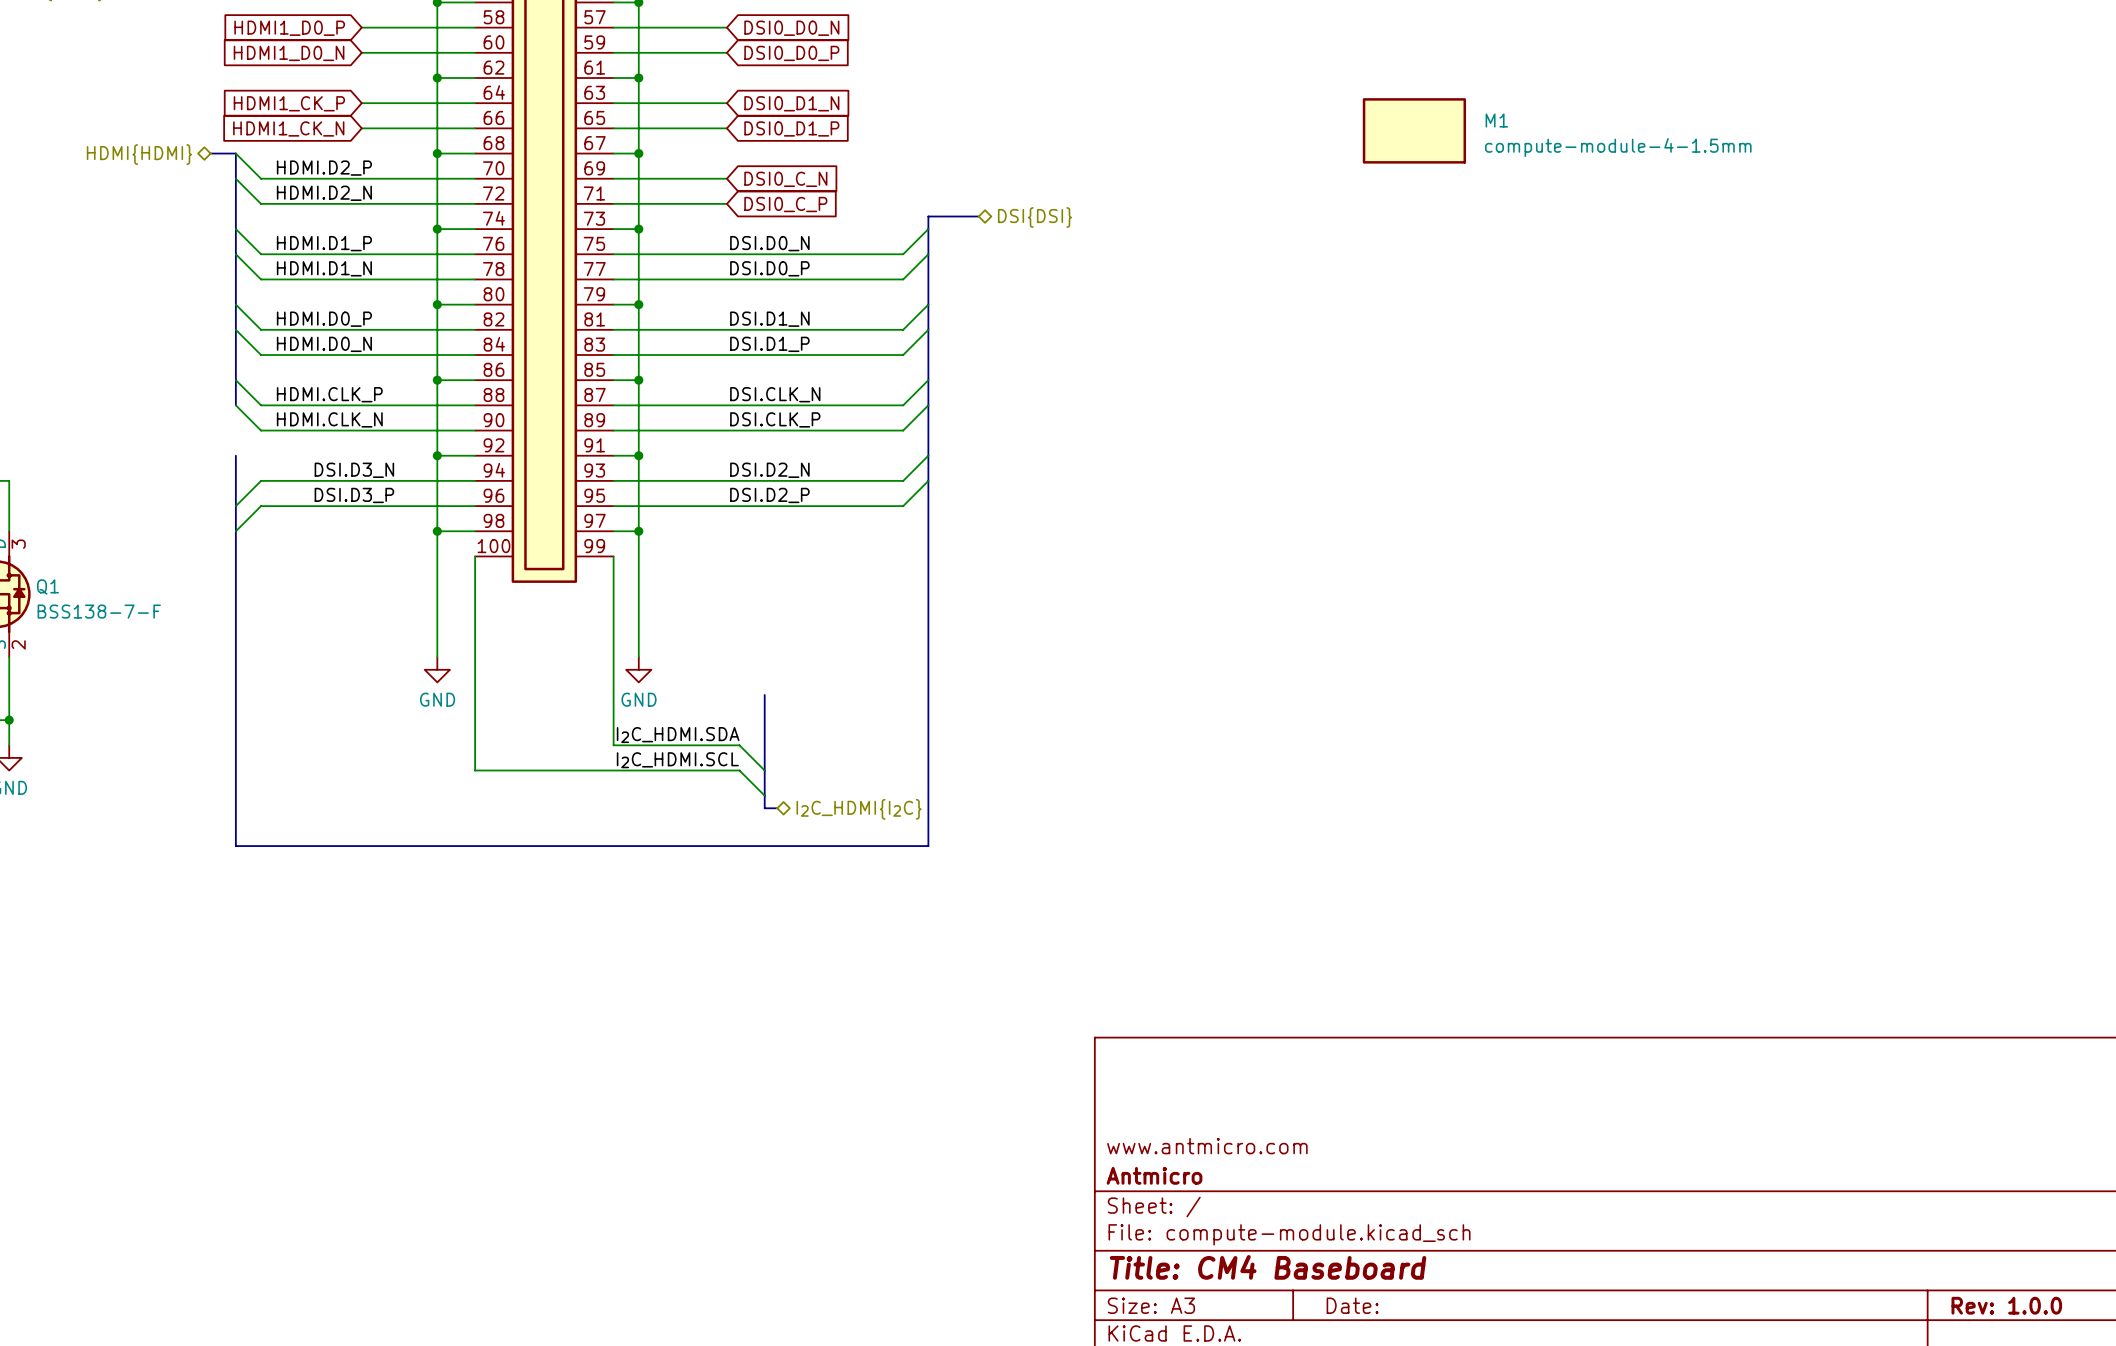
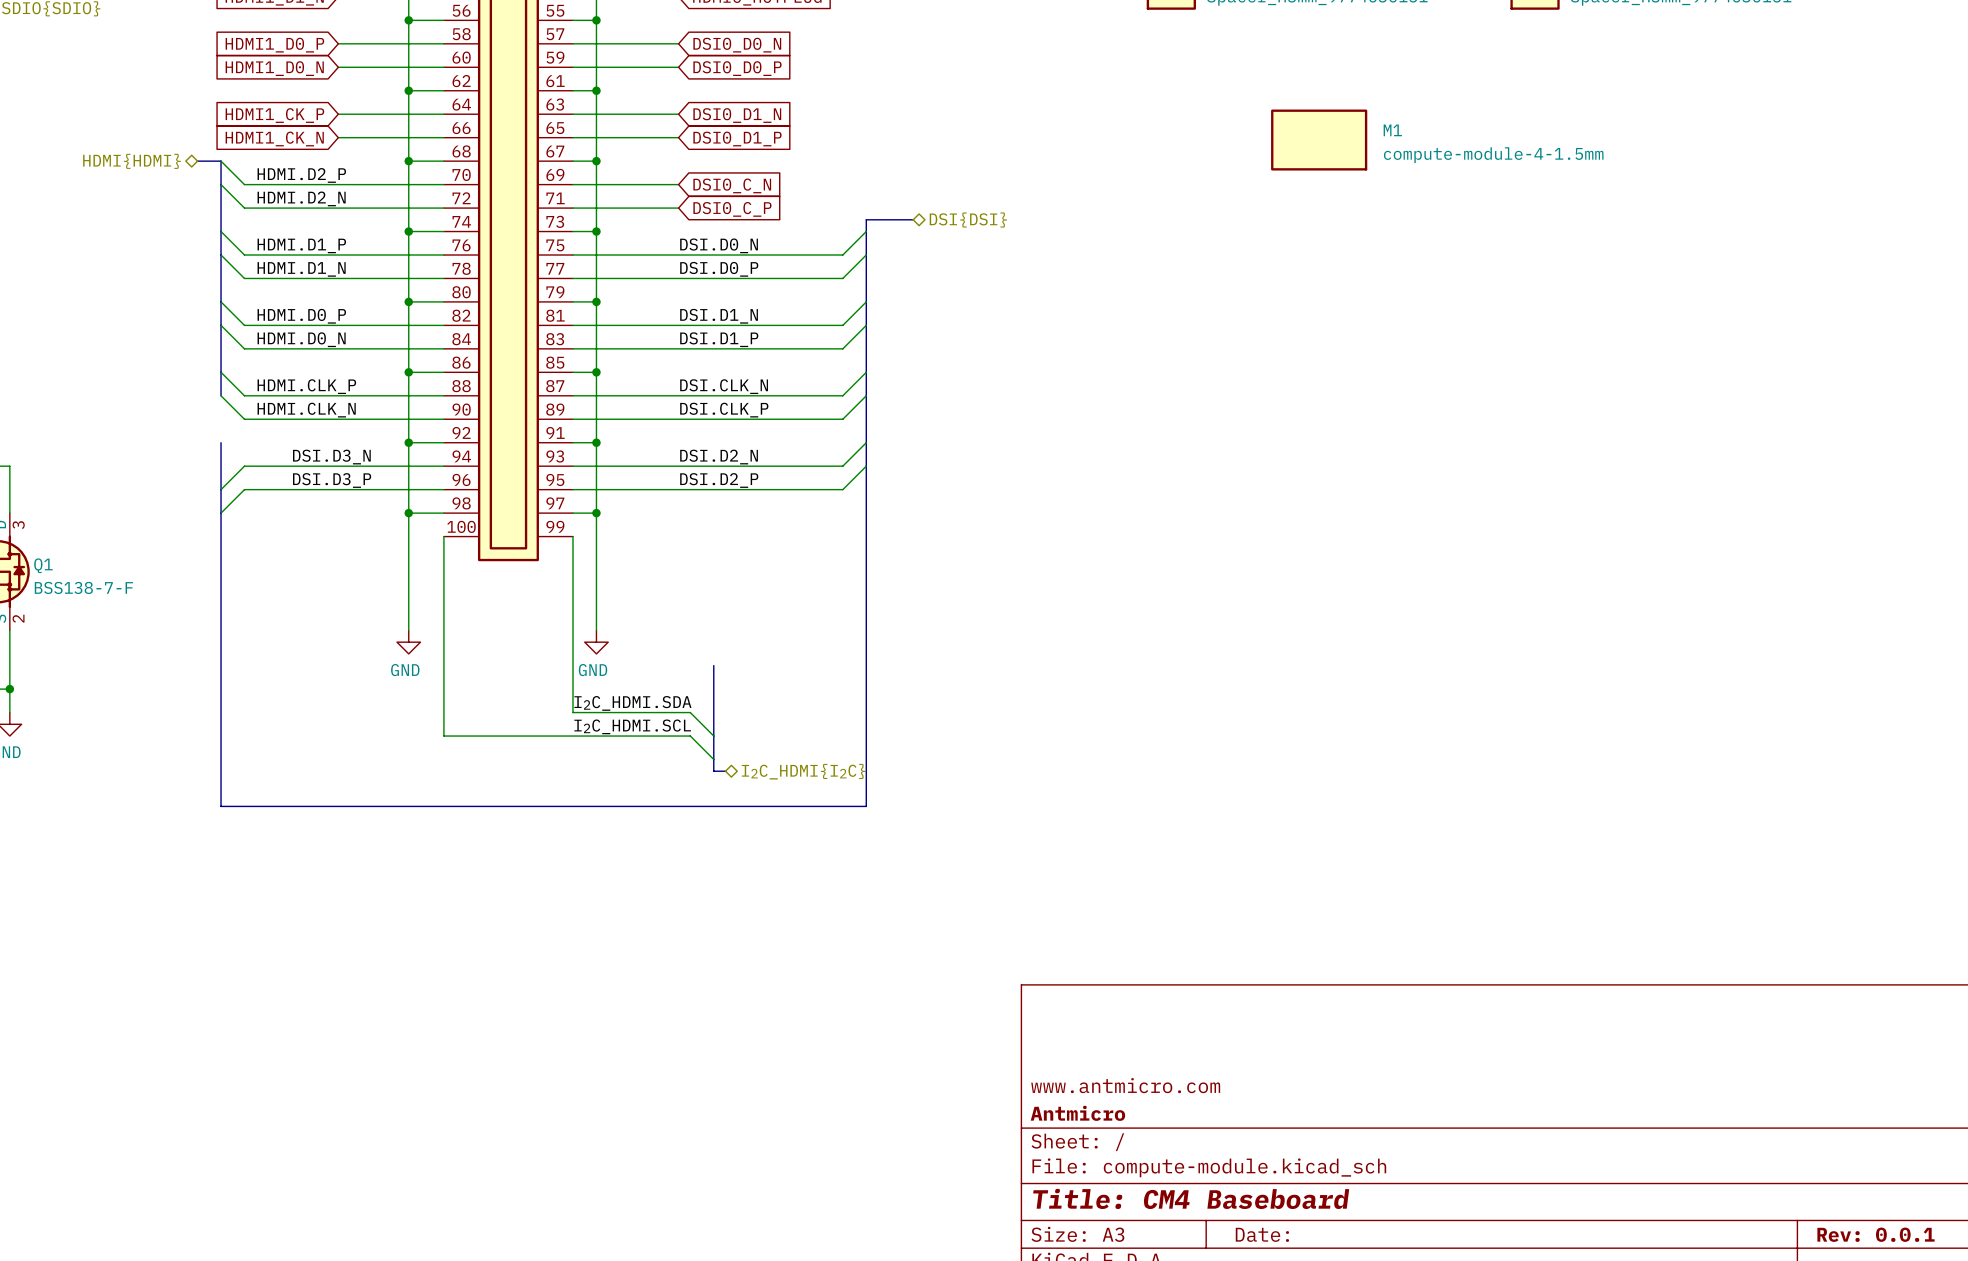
title block: Rev: 1.0.0 (2006, 1305) -> Rev: 0.0.1 (1876, 1234)

